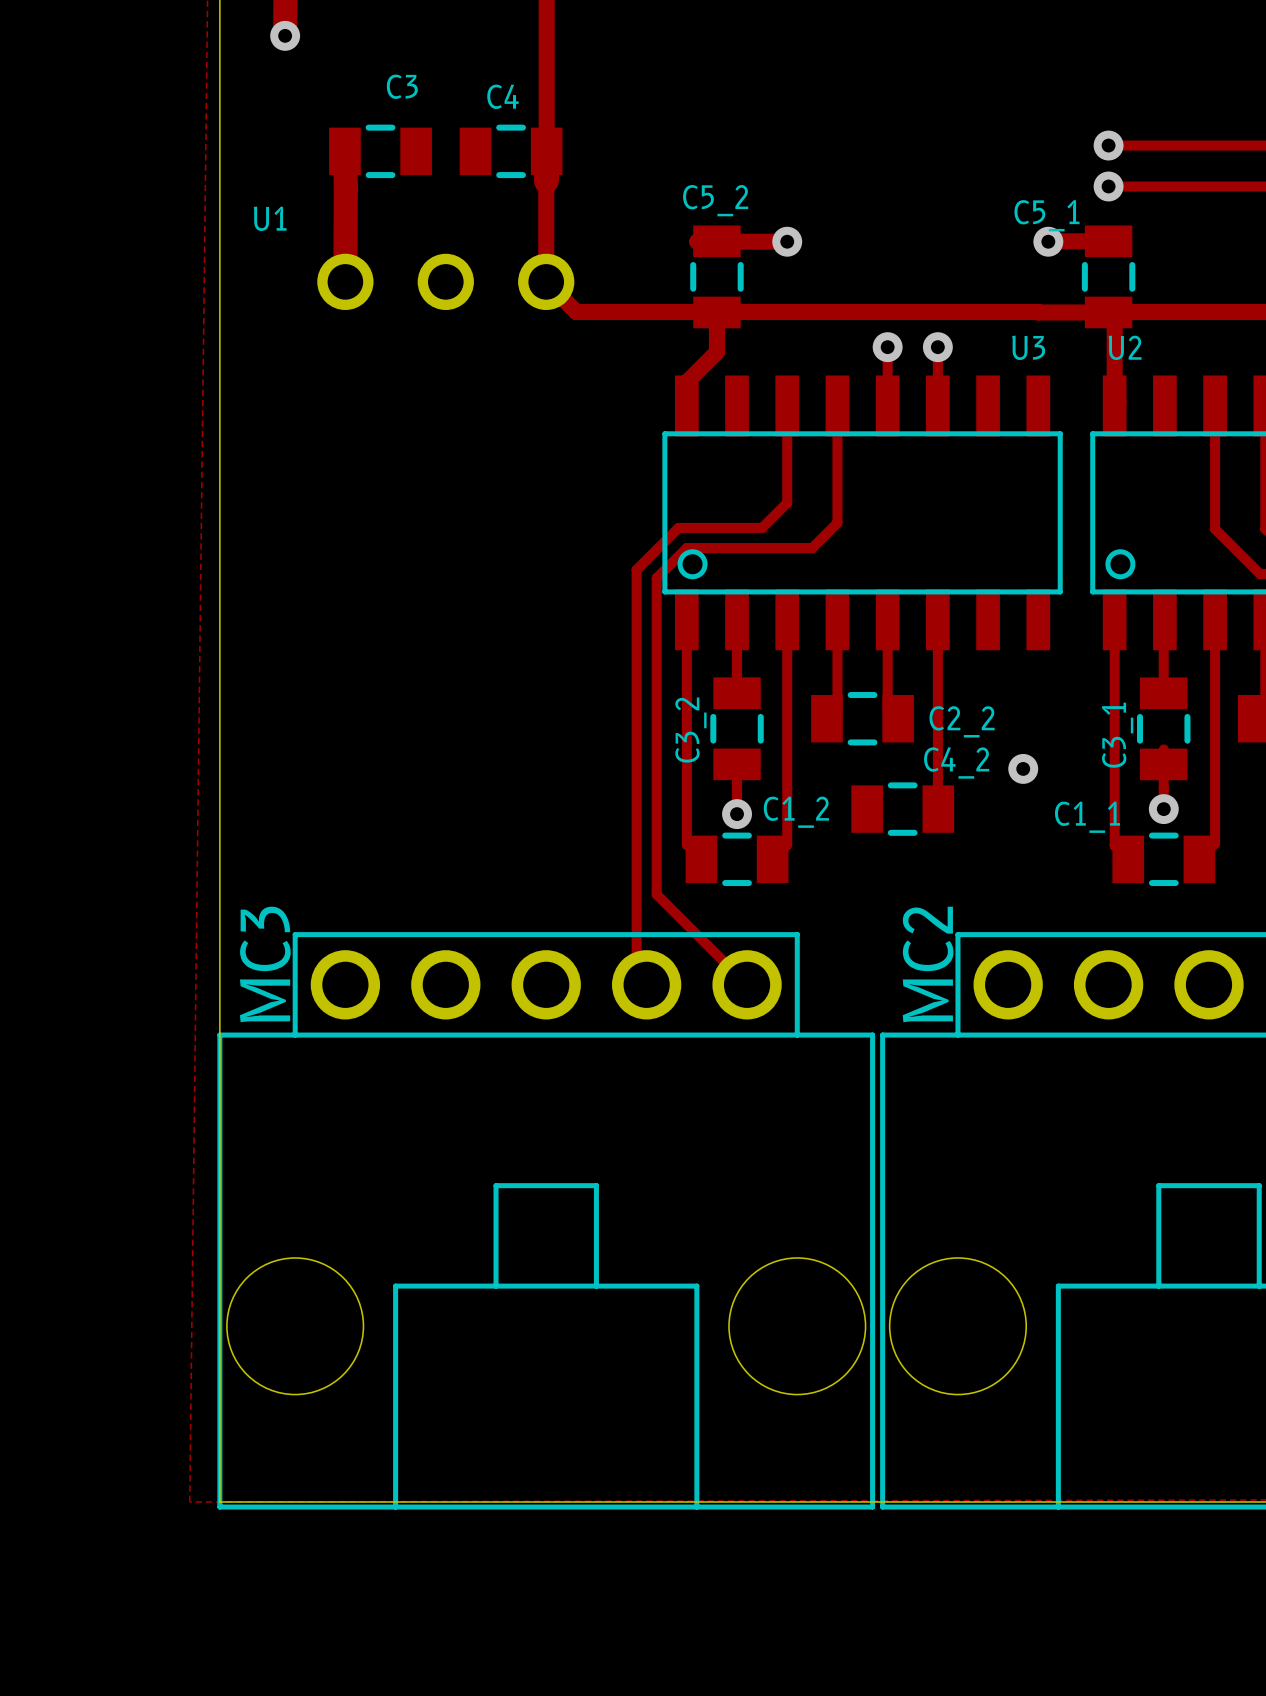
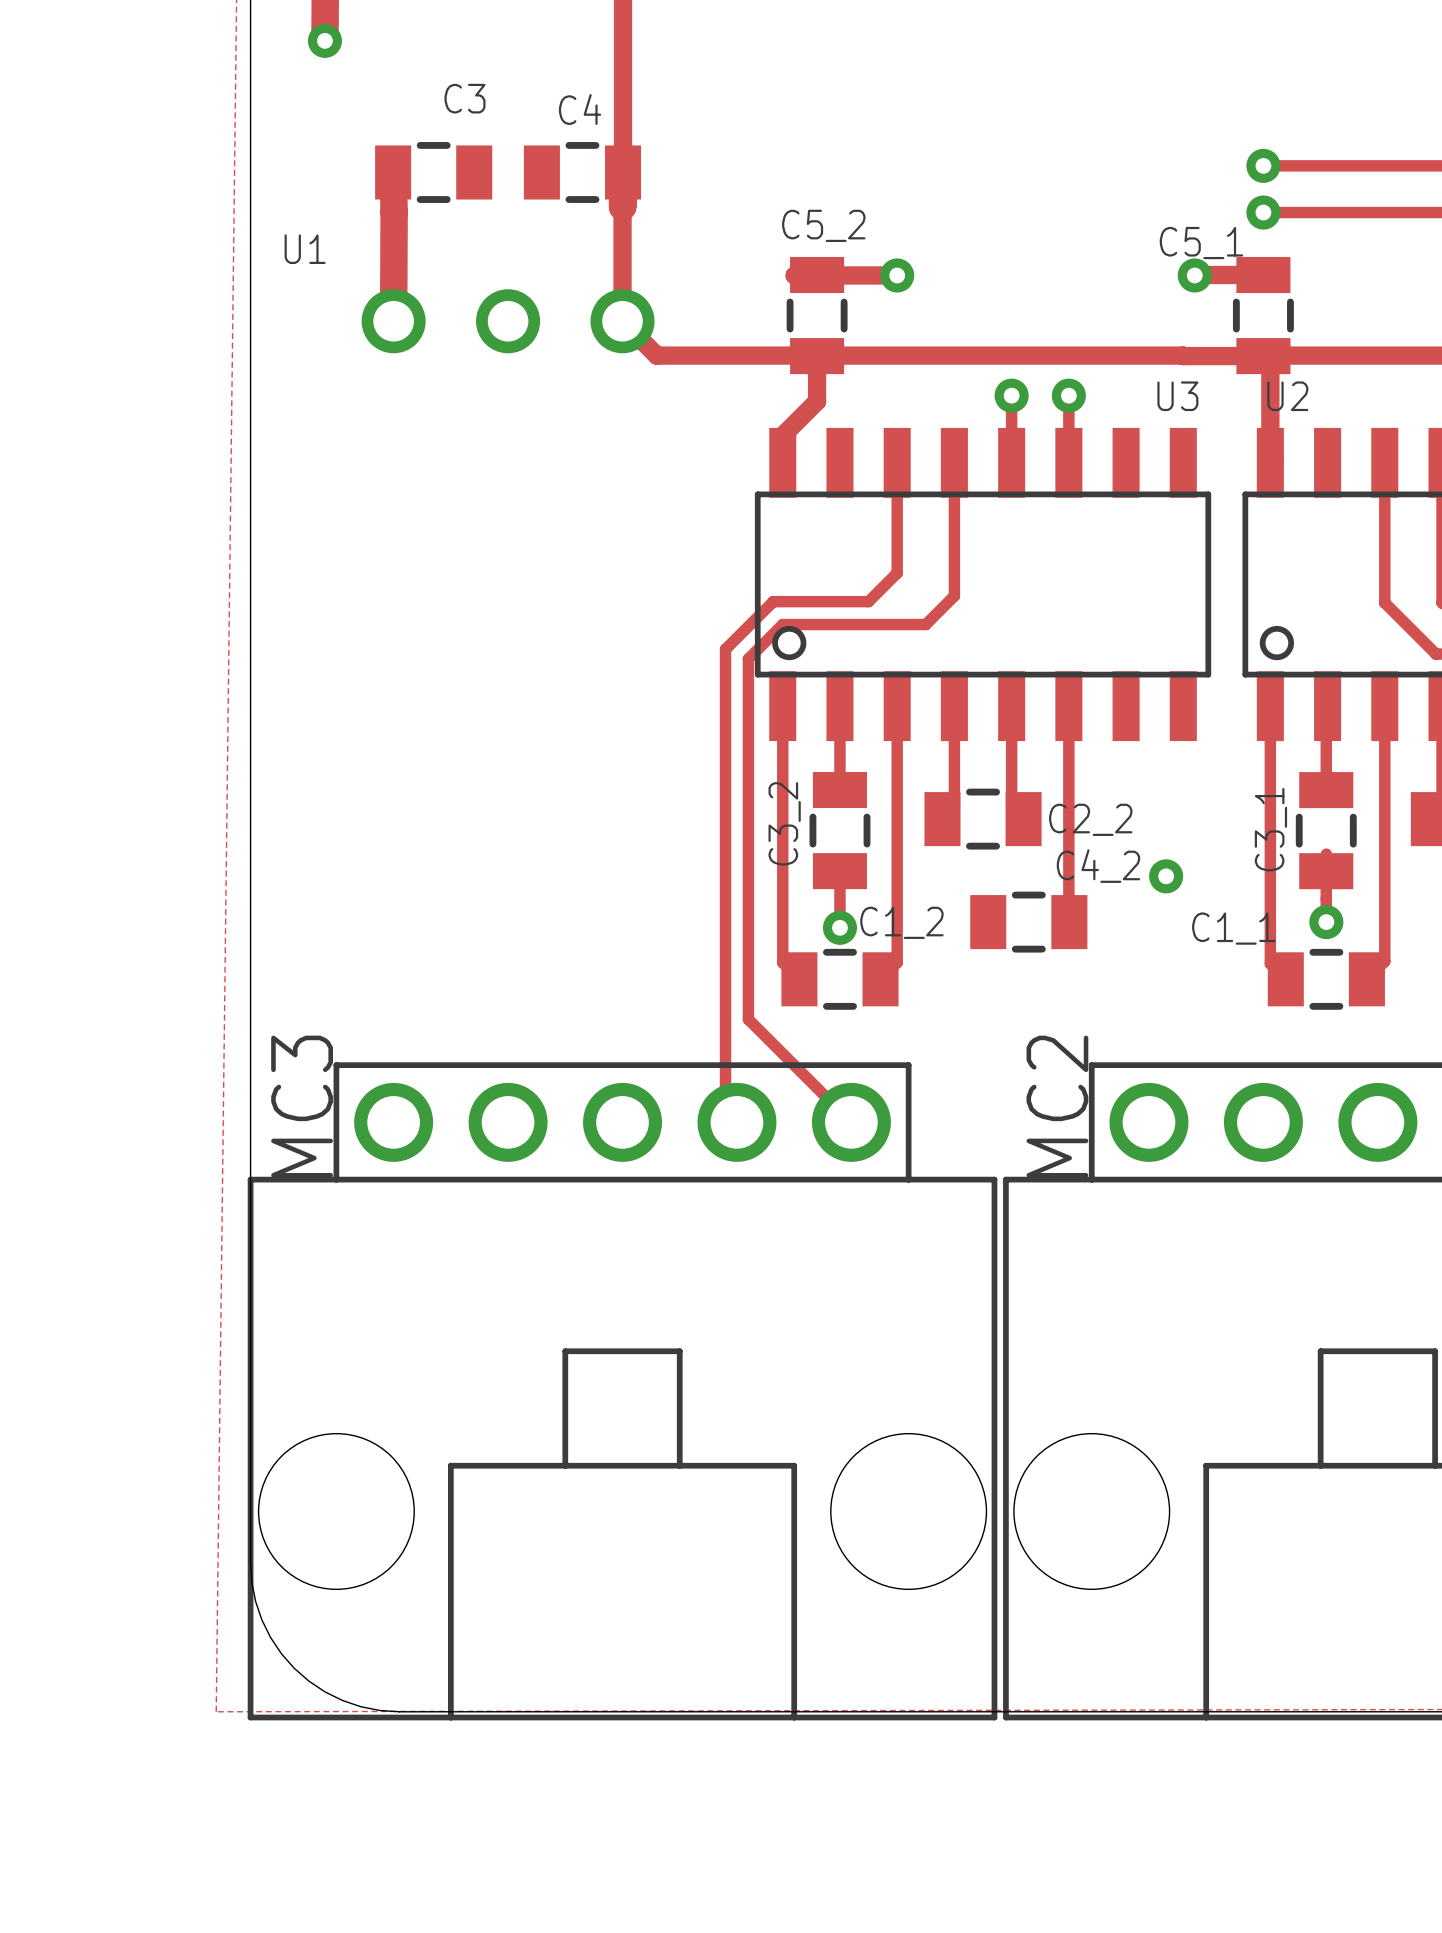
board edge: (219, 1371) (219, 1501) (350, 1501) -> (250, 1563) (251, 1582) (261, 1619) (281, 1653) (294, 1668) (308, 1681) (342, 1700) (379, 1710) (399, 1711)

